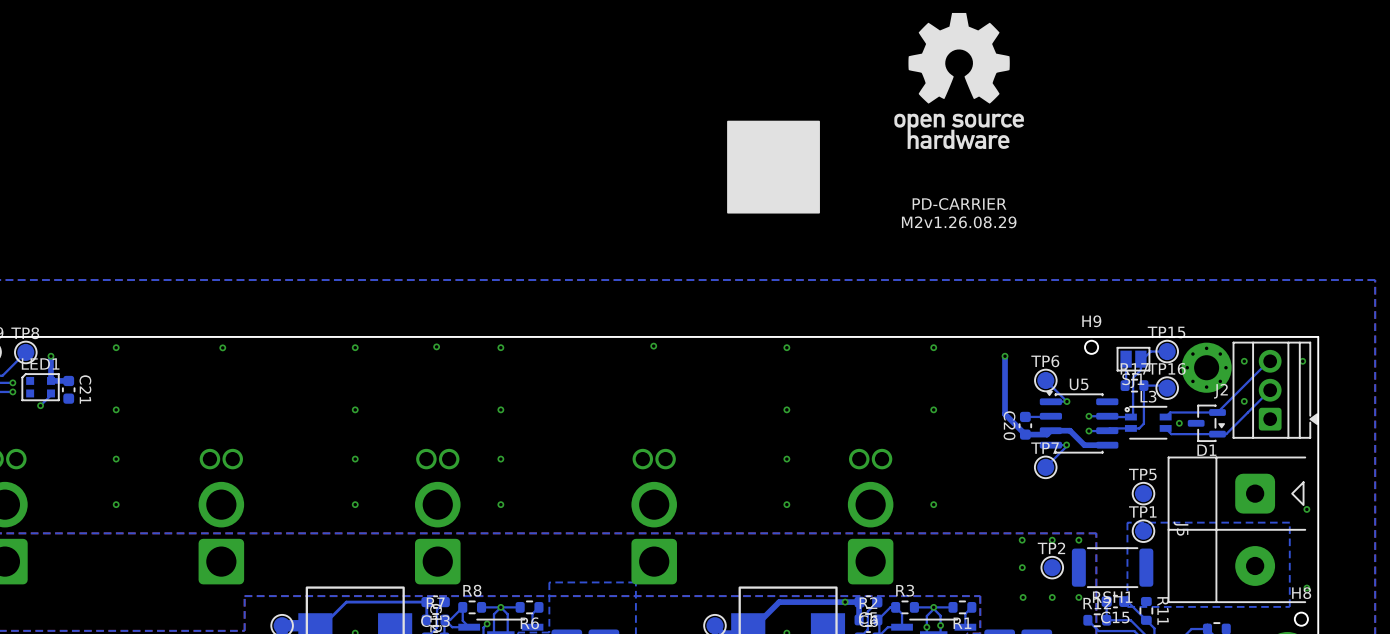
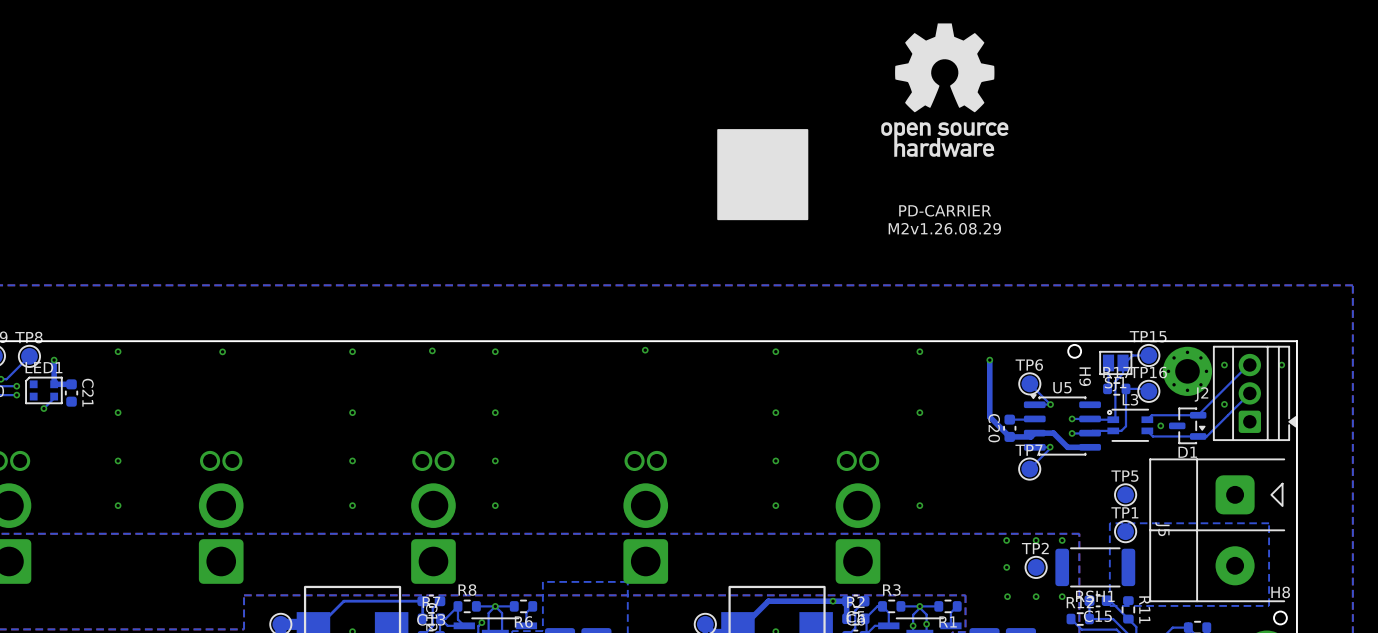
H9 name rotation: 0° (1091, 321) -> 90° clockwise (1085, 376)
H9 name position: H9 (1091, 321) -> H9 (1085, 376)
via: (1306, 509) -> none
via: (1306, 588) -> none

